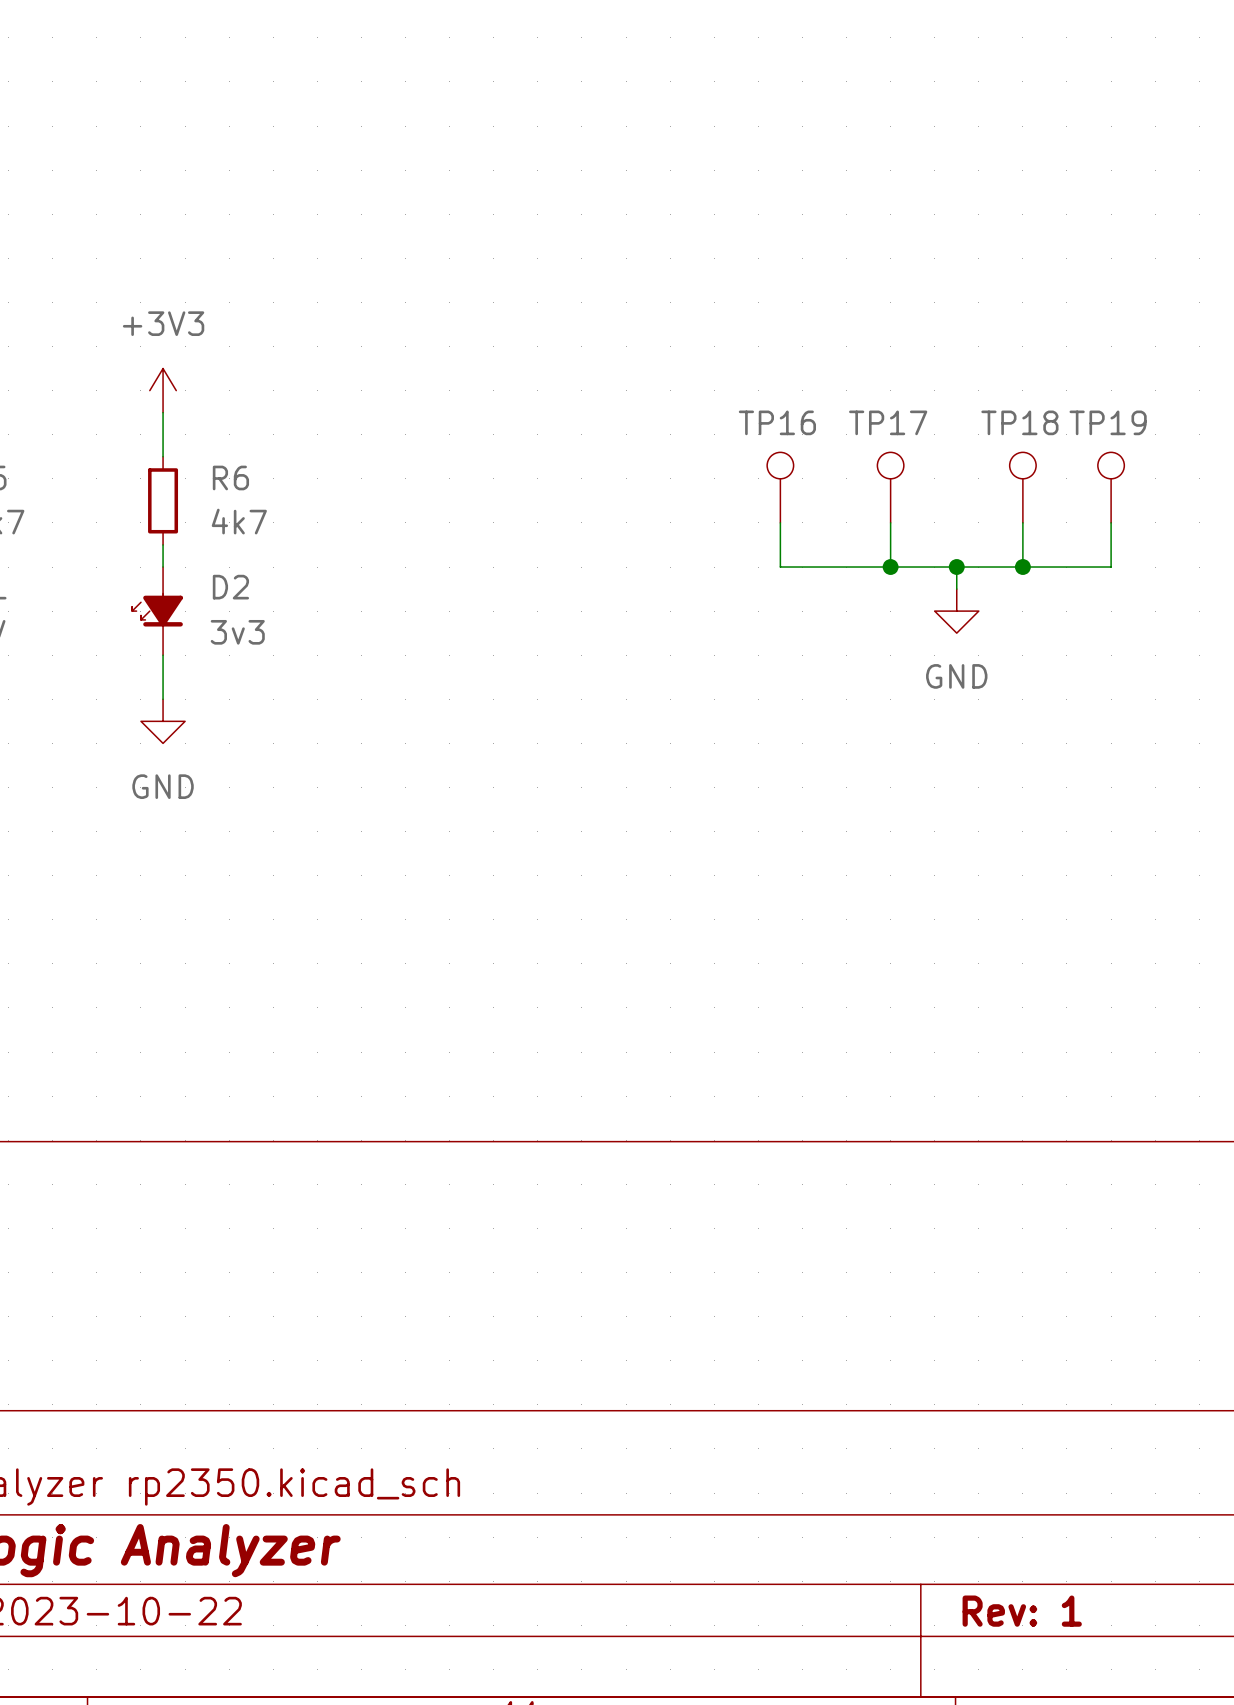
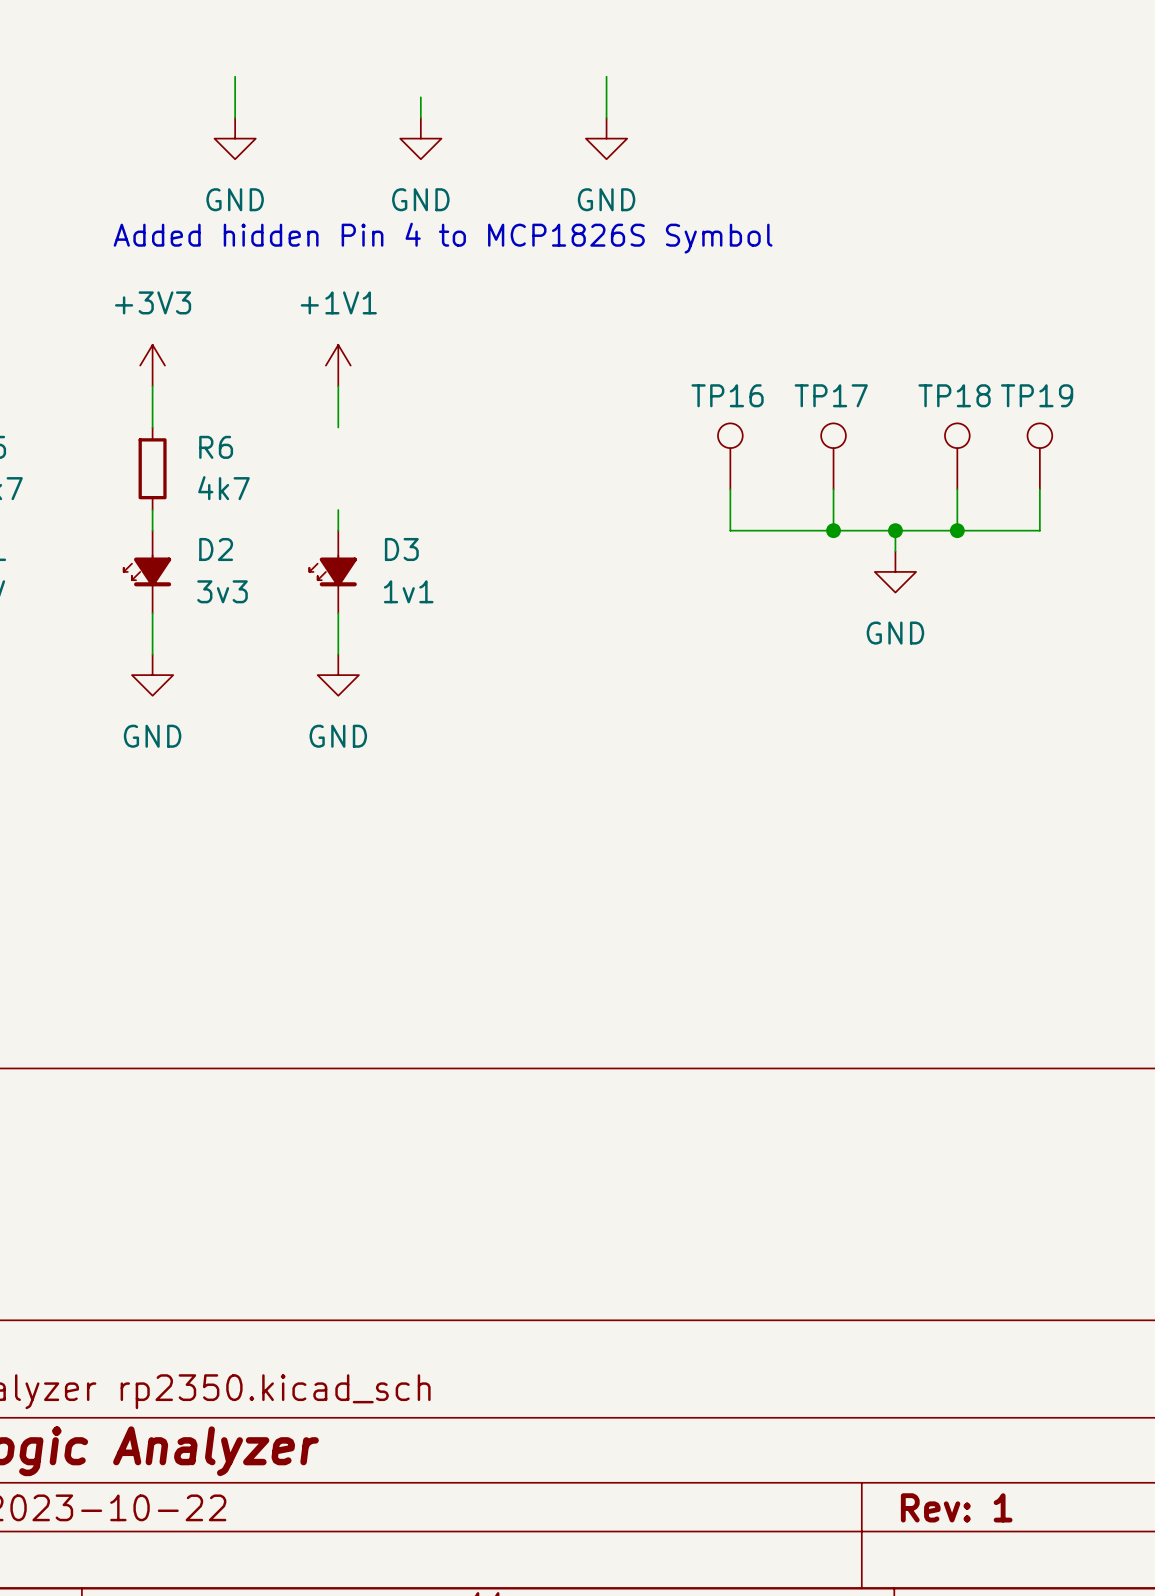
wire: none -> (235, 76) (235, 117)
wire: none -> (606, 76) (606, 117)
wire: none -> (420, 97) (420, 117)
power symbol: none -> GND (235, 138)
power symbol: none -> GND (420, 138)
power symbol: none -> GND (606, 138)
text: none -> Added hidden Pin 4 to MCP1826S Symbol (443, 238)
power symbol: none -> +1V1 (338, 365)
wire: none -> (338, 386) (338, 427)
wire: none -> (338, 510) (338, 530)
D3: none -> 1v1 (333, 571)
wire: none -> (338, 613) (338, 654)
power symbol: none -> GND (338, 675)

